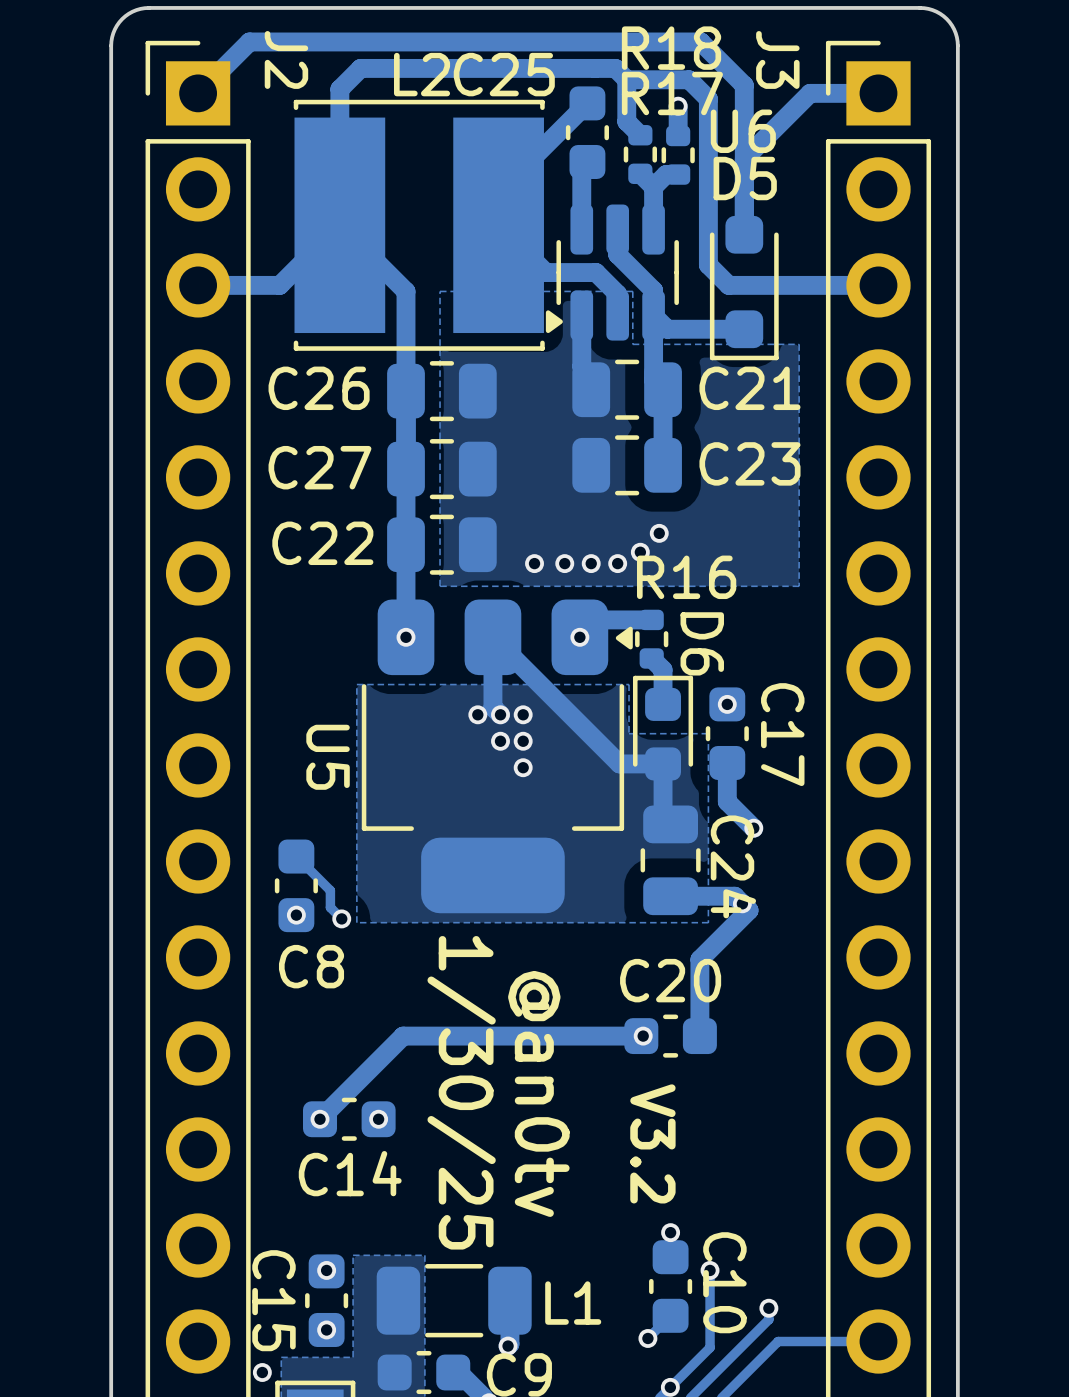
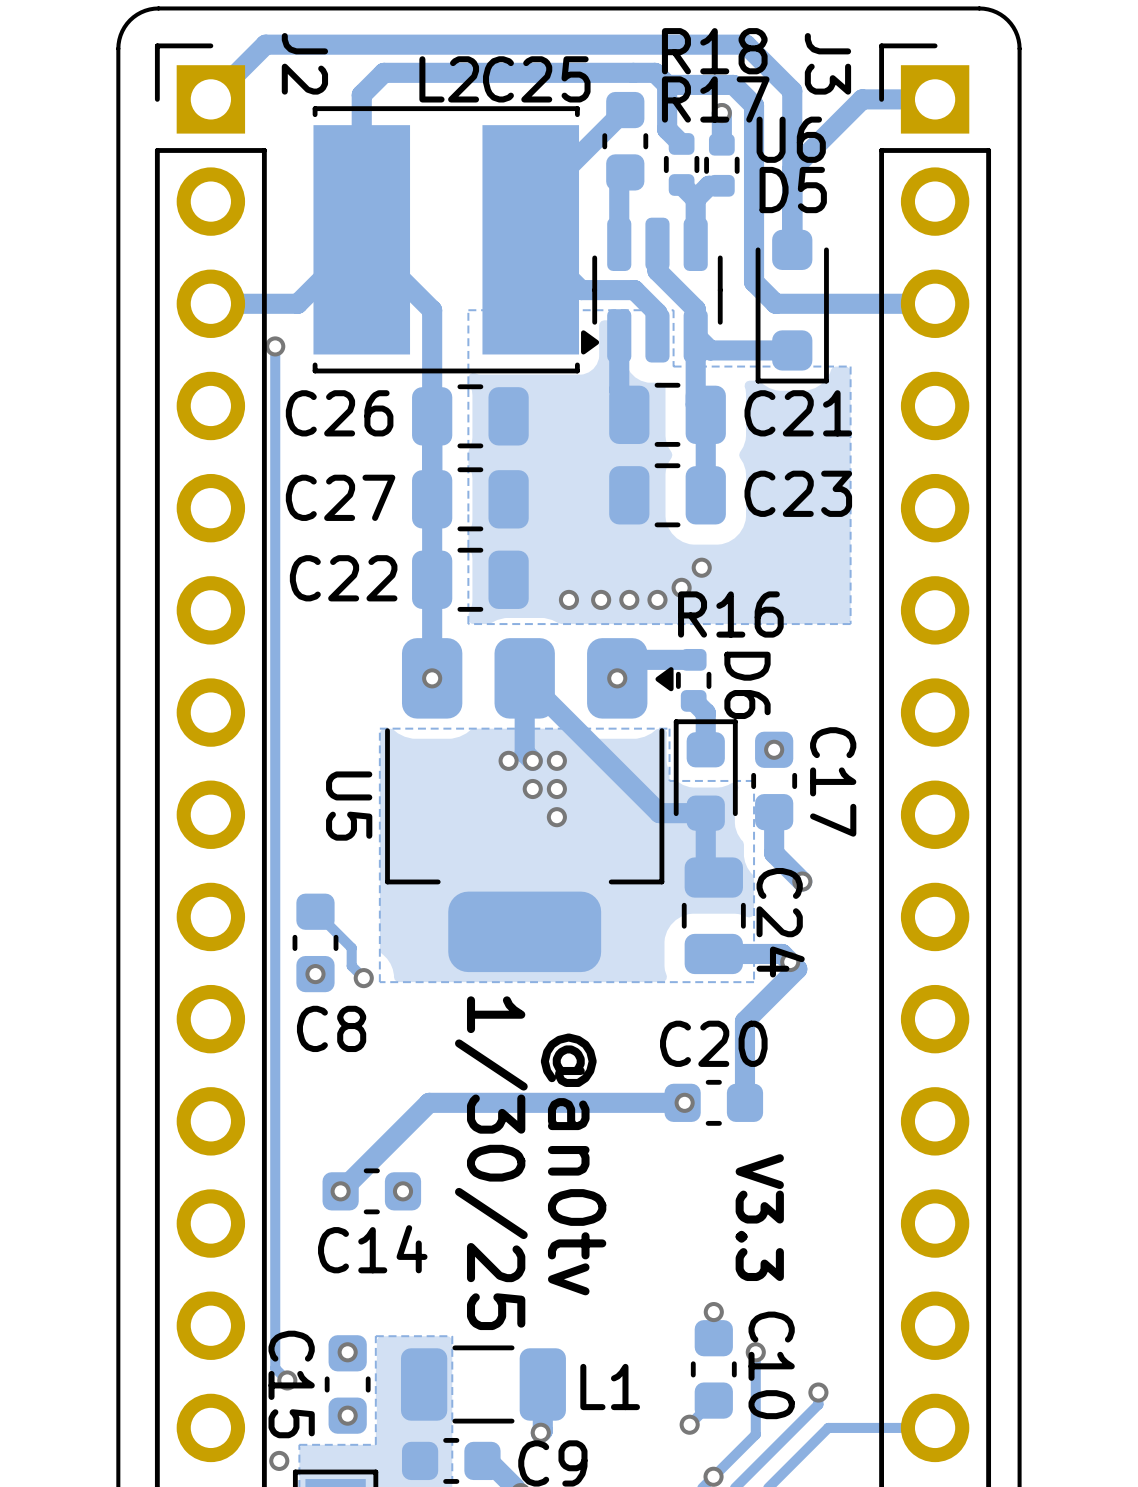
track: none -> (275, 346) (275, 1368) (287, 1380)
via: none -> (275, 346)
text: V3.2 (652, 1143) -> V3.3 (759, 1217)
via: none -> (287, 1380)

